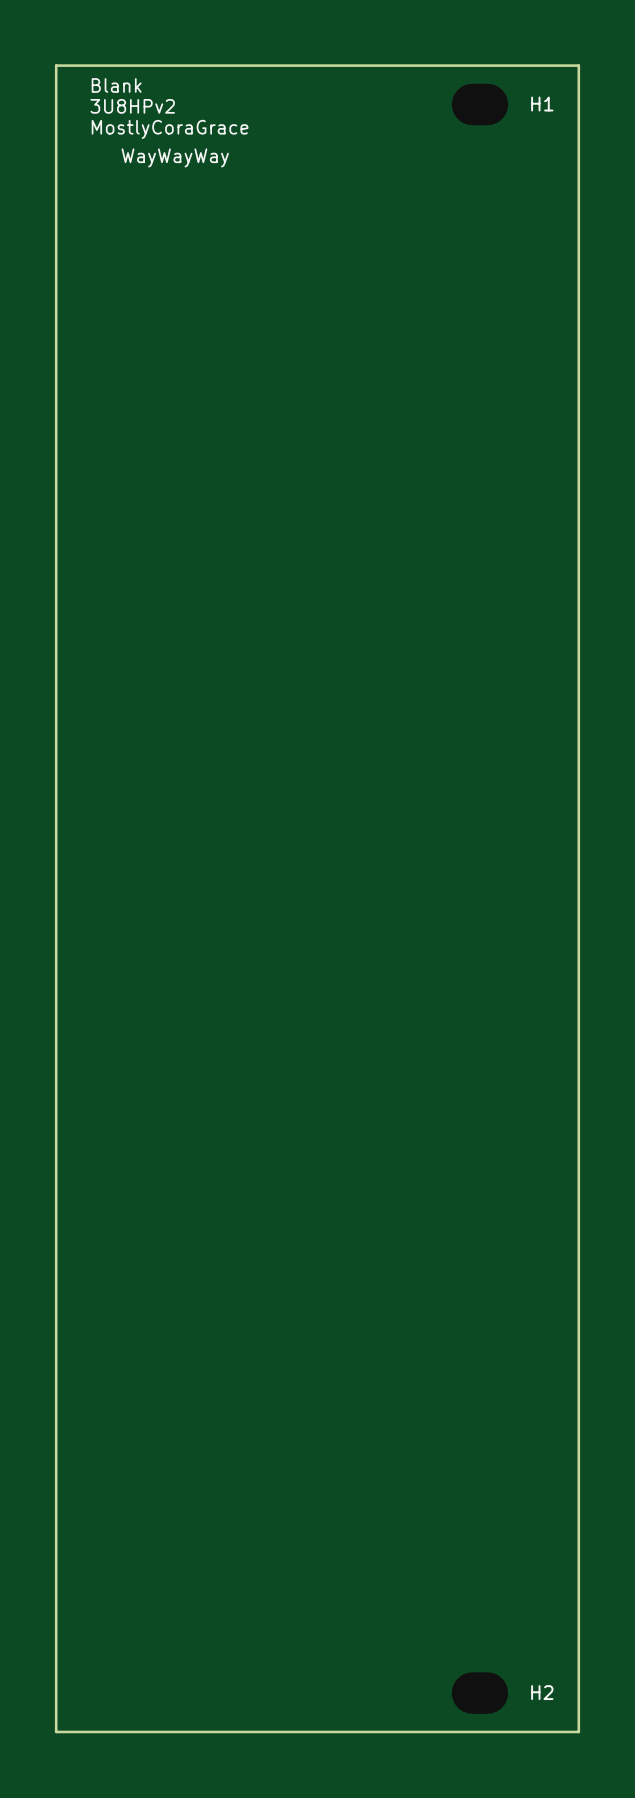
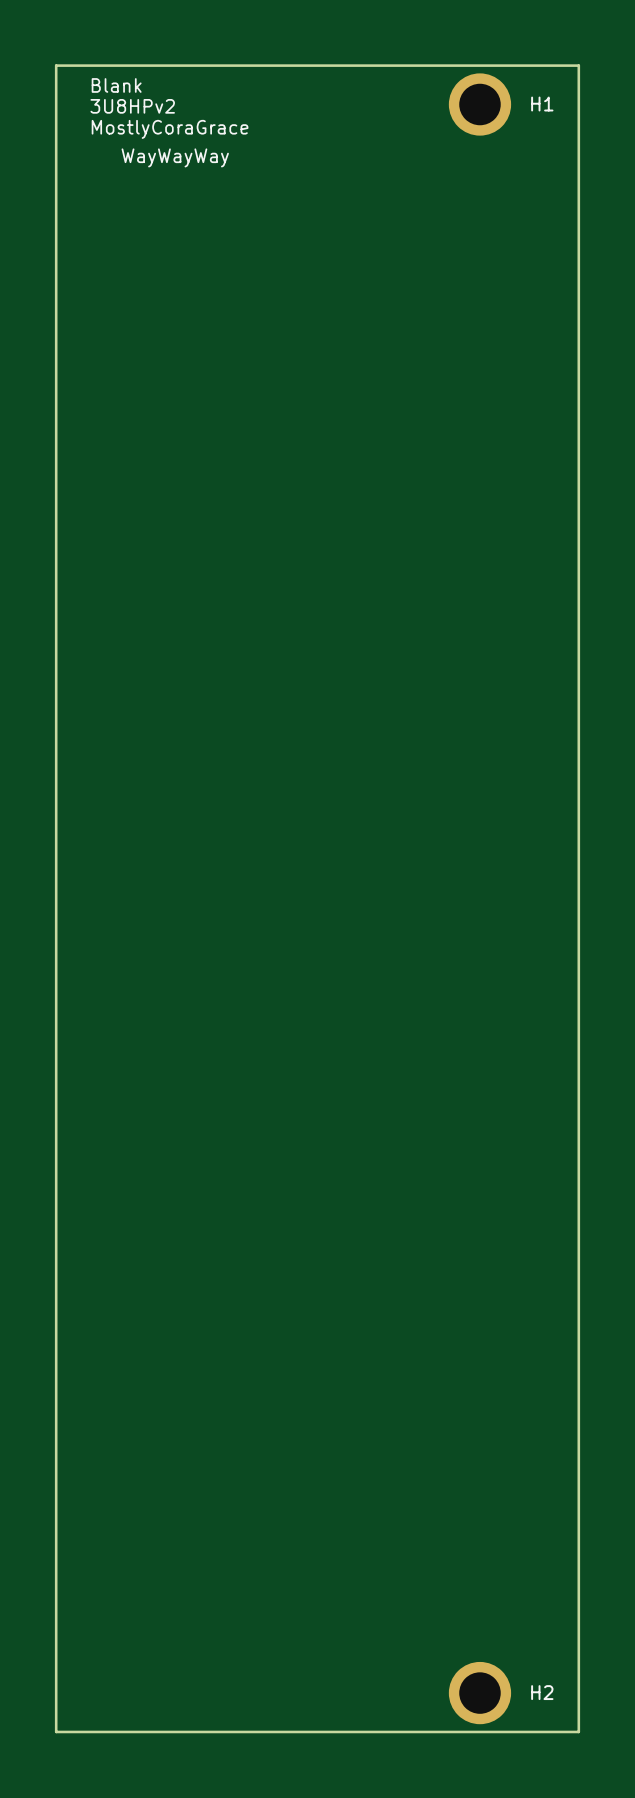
H1 footprint: [451, 83, 509, 126] -> [448, 73, 512, 136]
H2 footprint: [451, 1672, 509, 1714] -> [448, 1661, 512, 1725]

